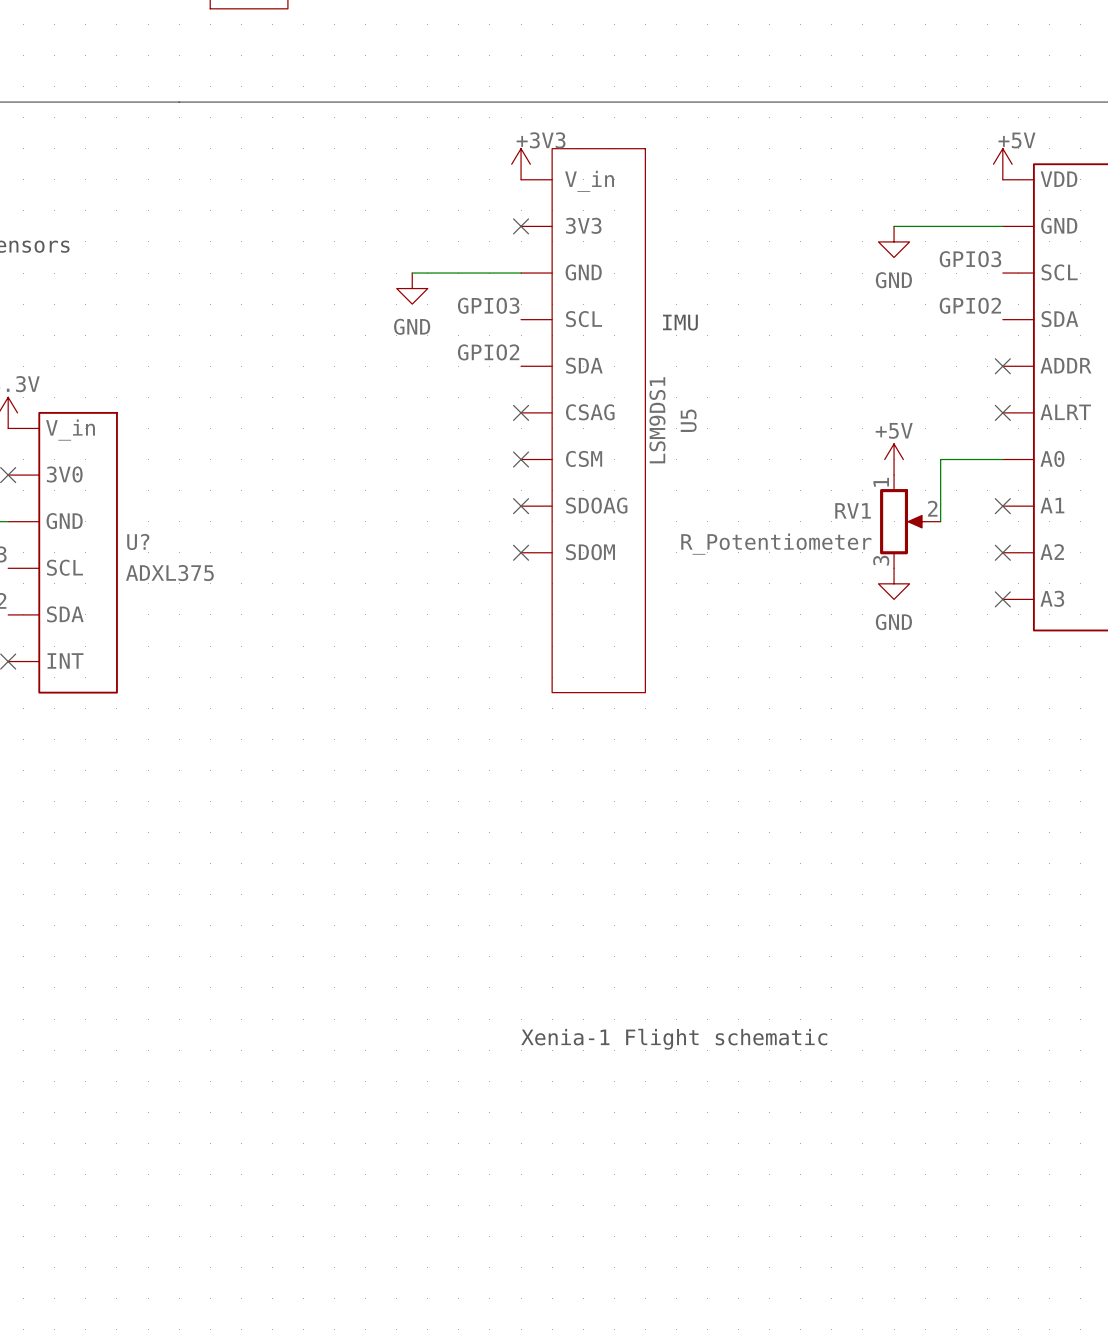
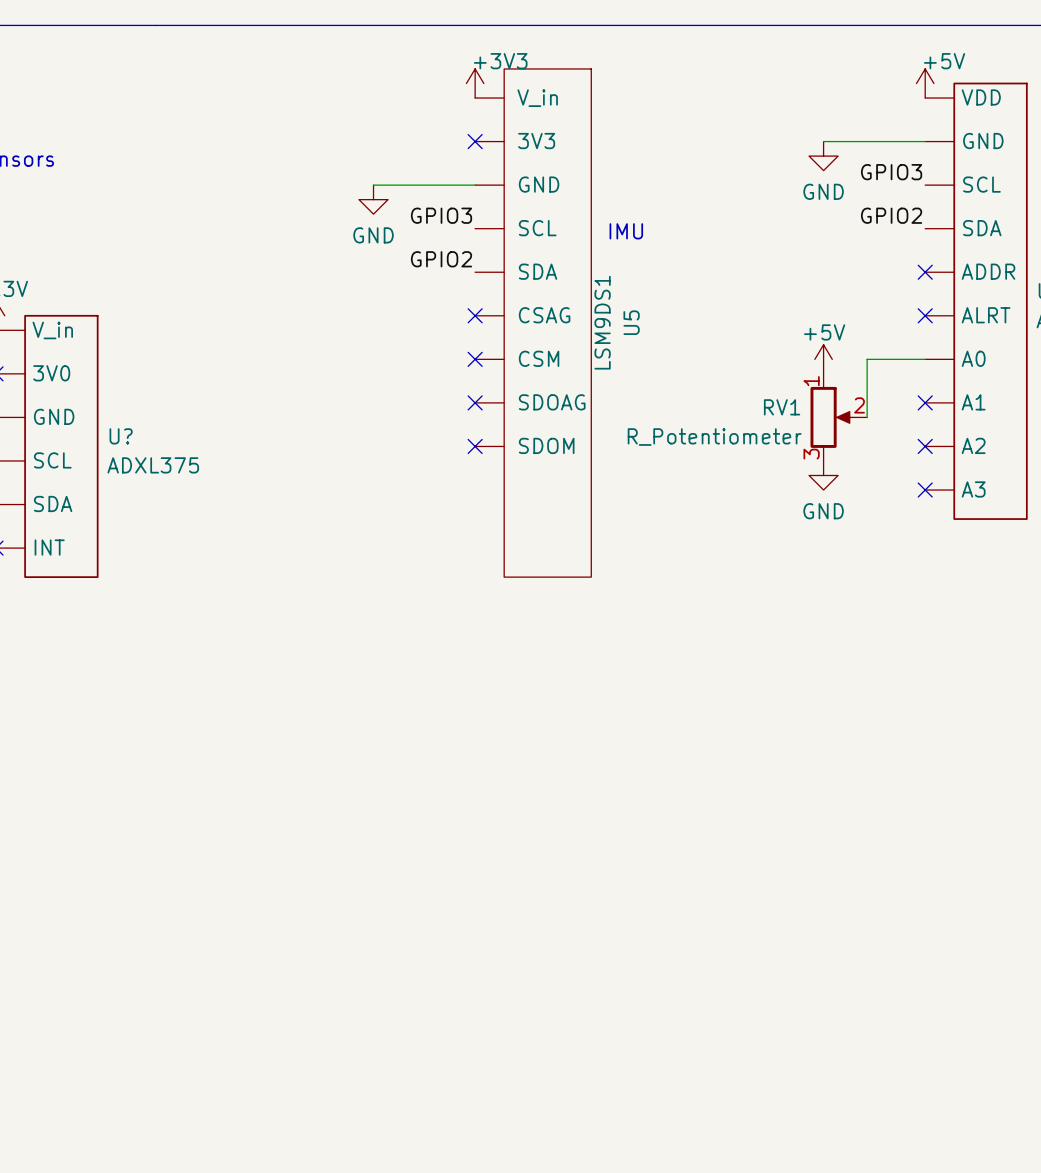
text: Xenia-1 Flight schematic (674, 1039) -> none

